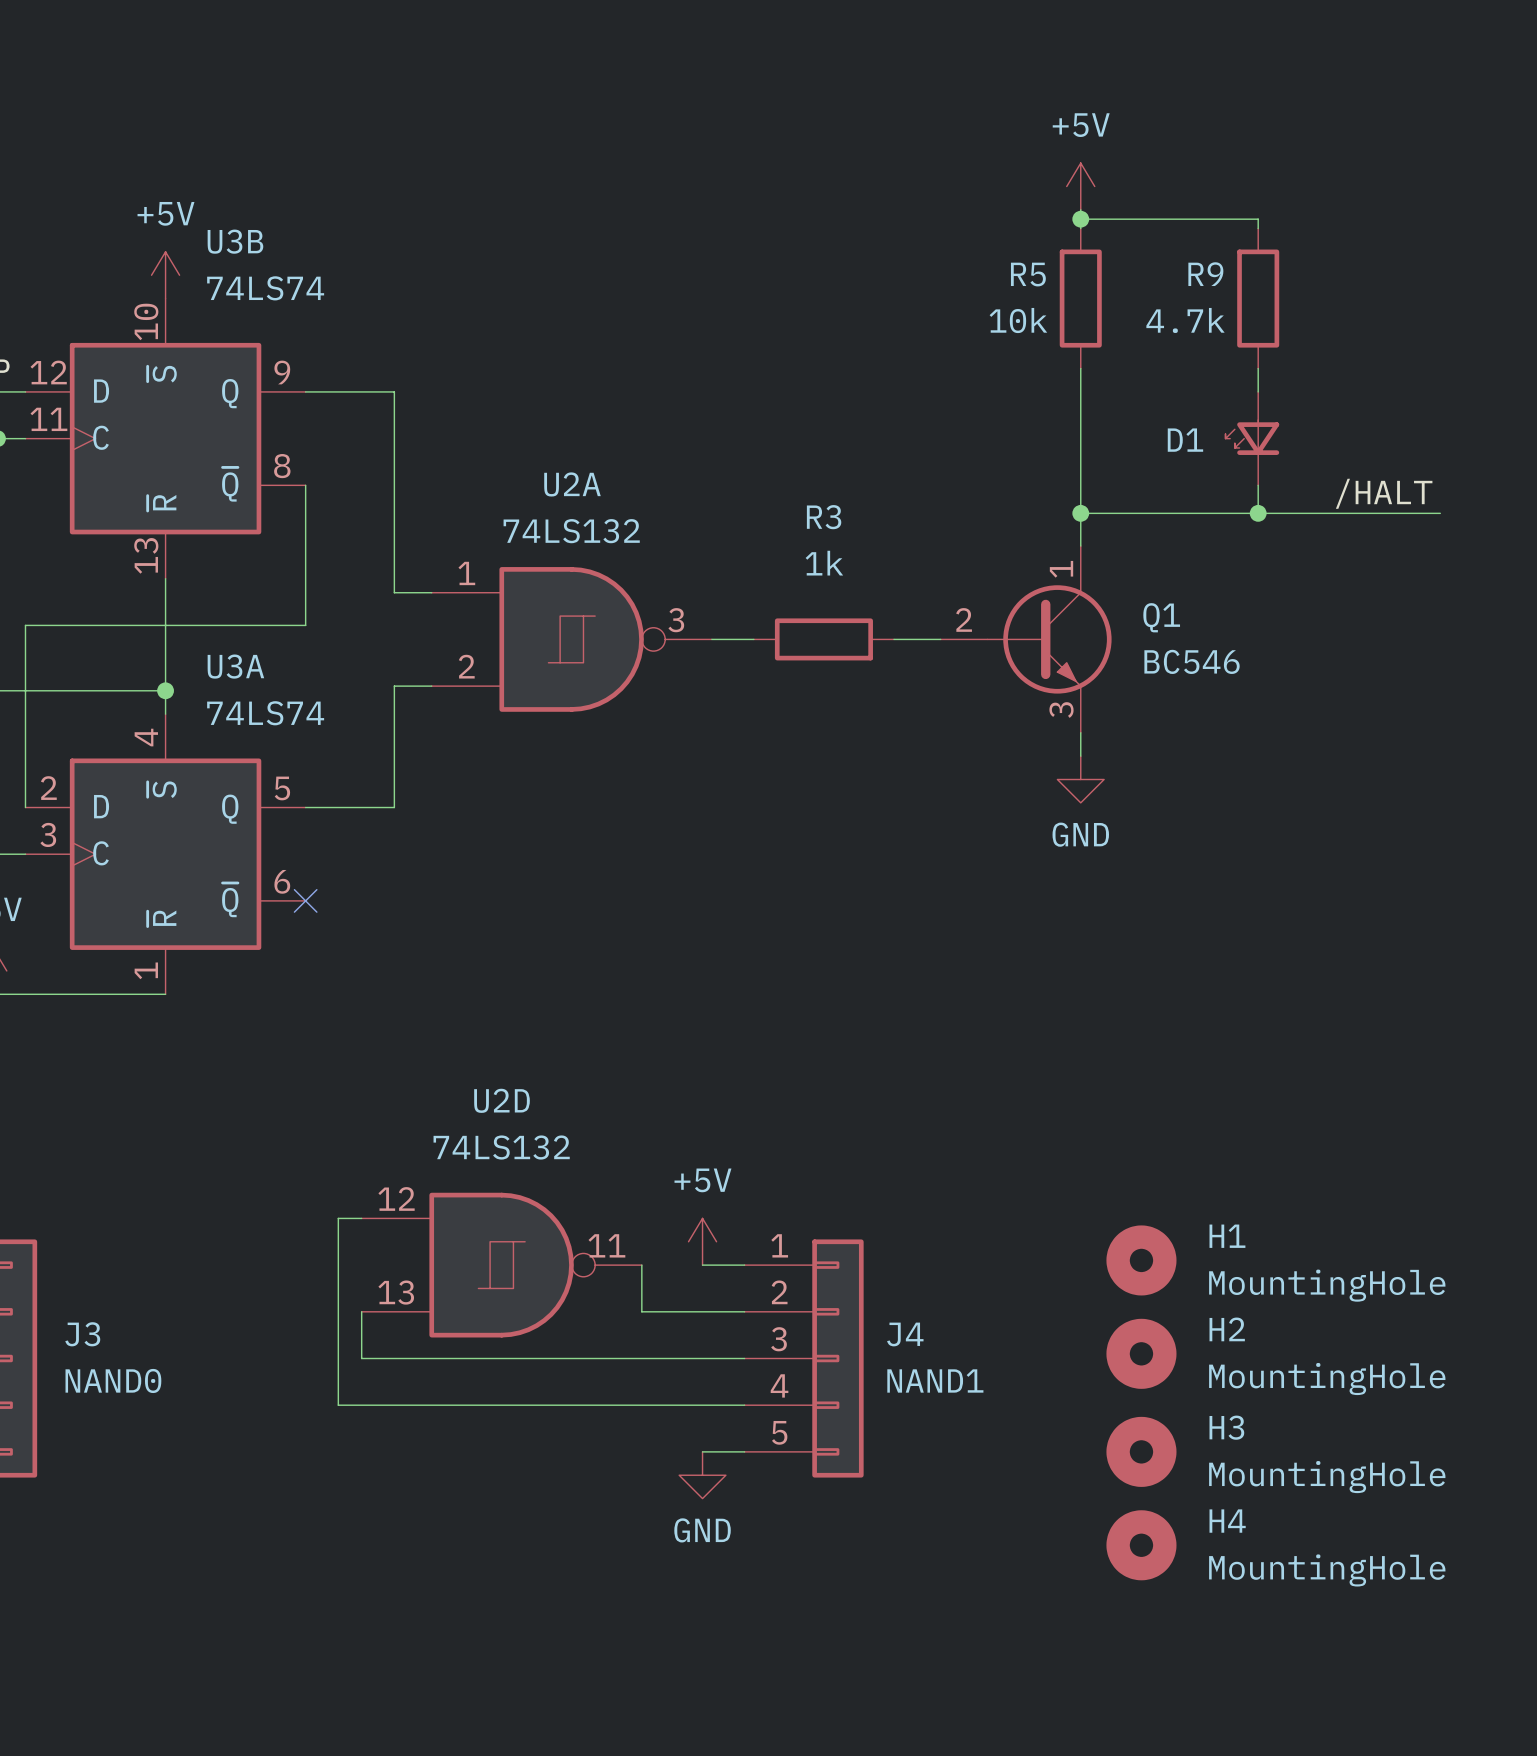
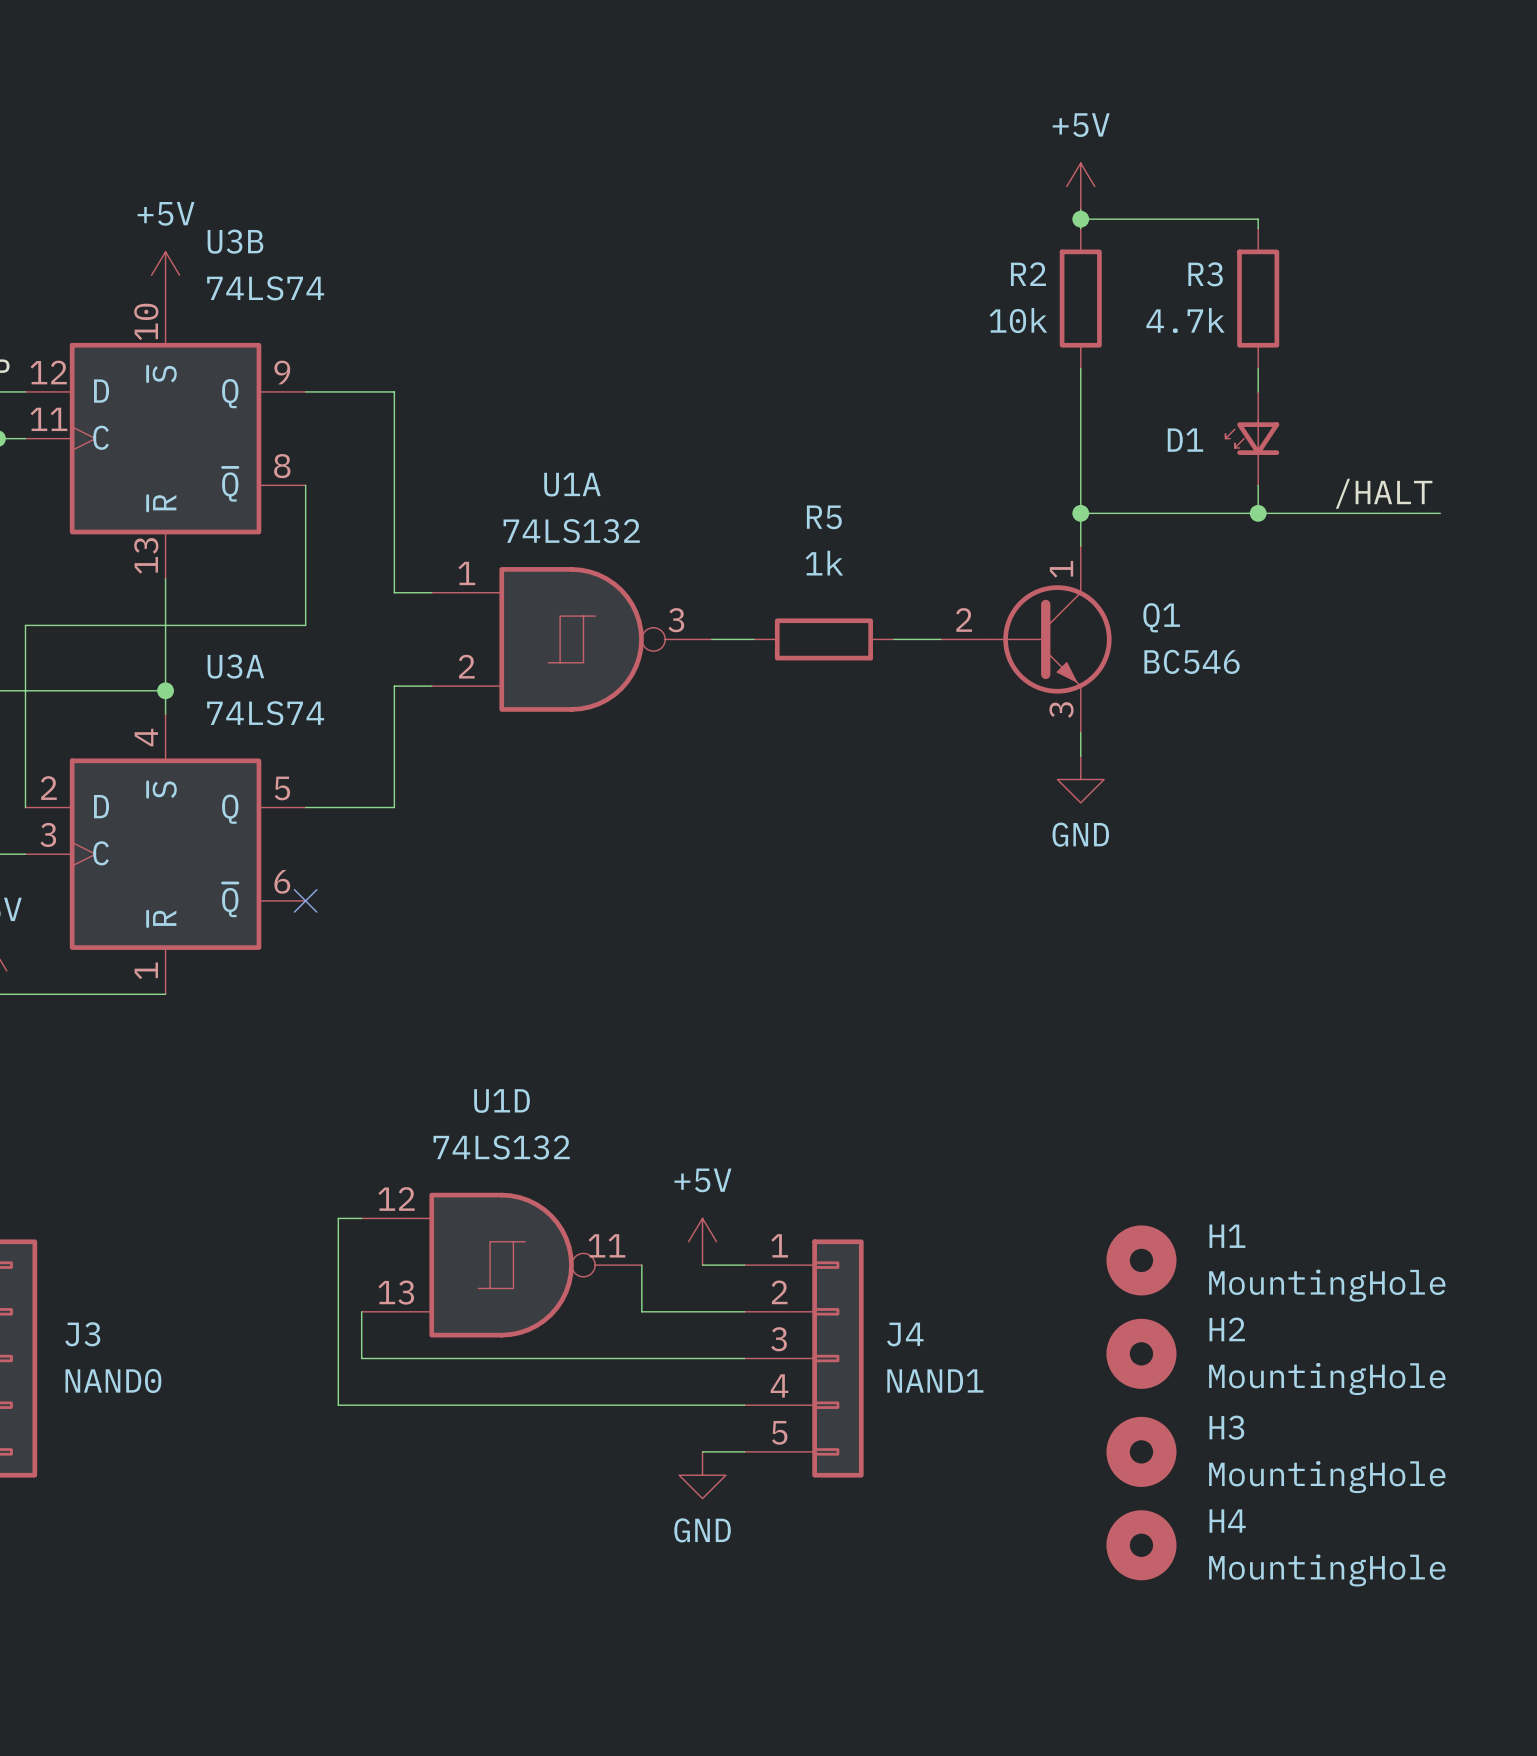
R5 name: R5 (1028, 274) -> R2 (1028, 274)
R9 name: R9 (1205, 274) -> R3 (1205, 274)
U2A name: U2A (572, 484) -> U1A (572, 484)
R3 name: R3 (824, 517) -> R5 (824, 517)
U2D name: U2D (502, 1100) -> U1D (502, 1101)

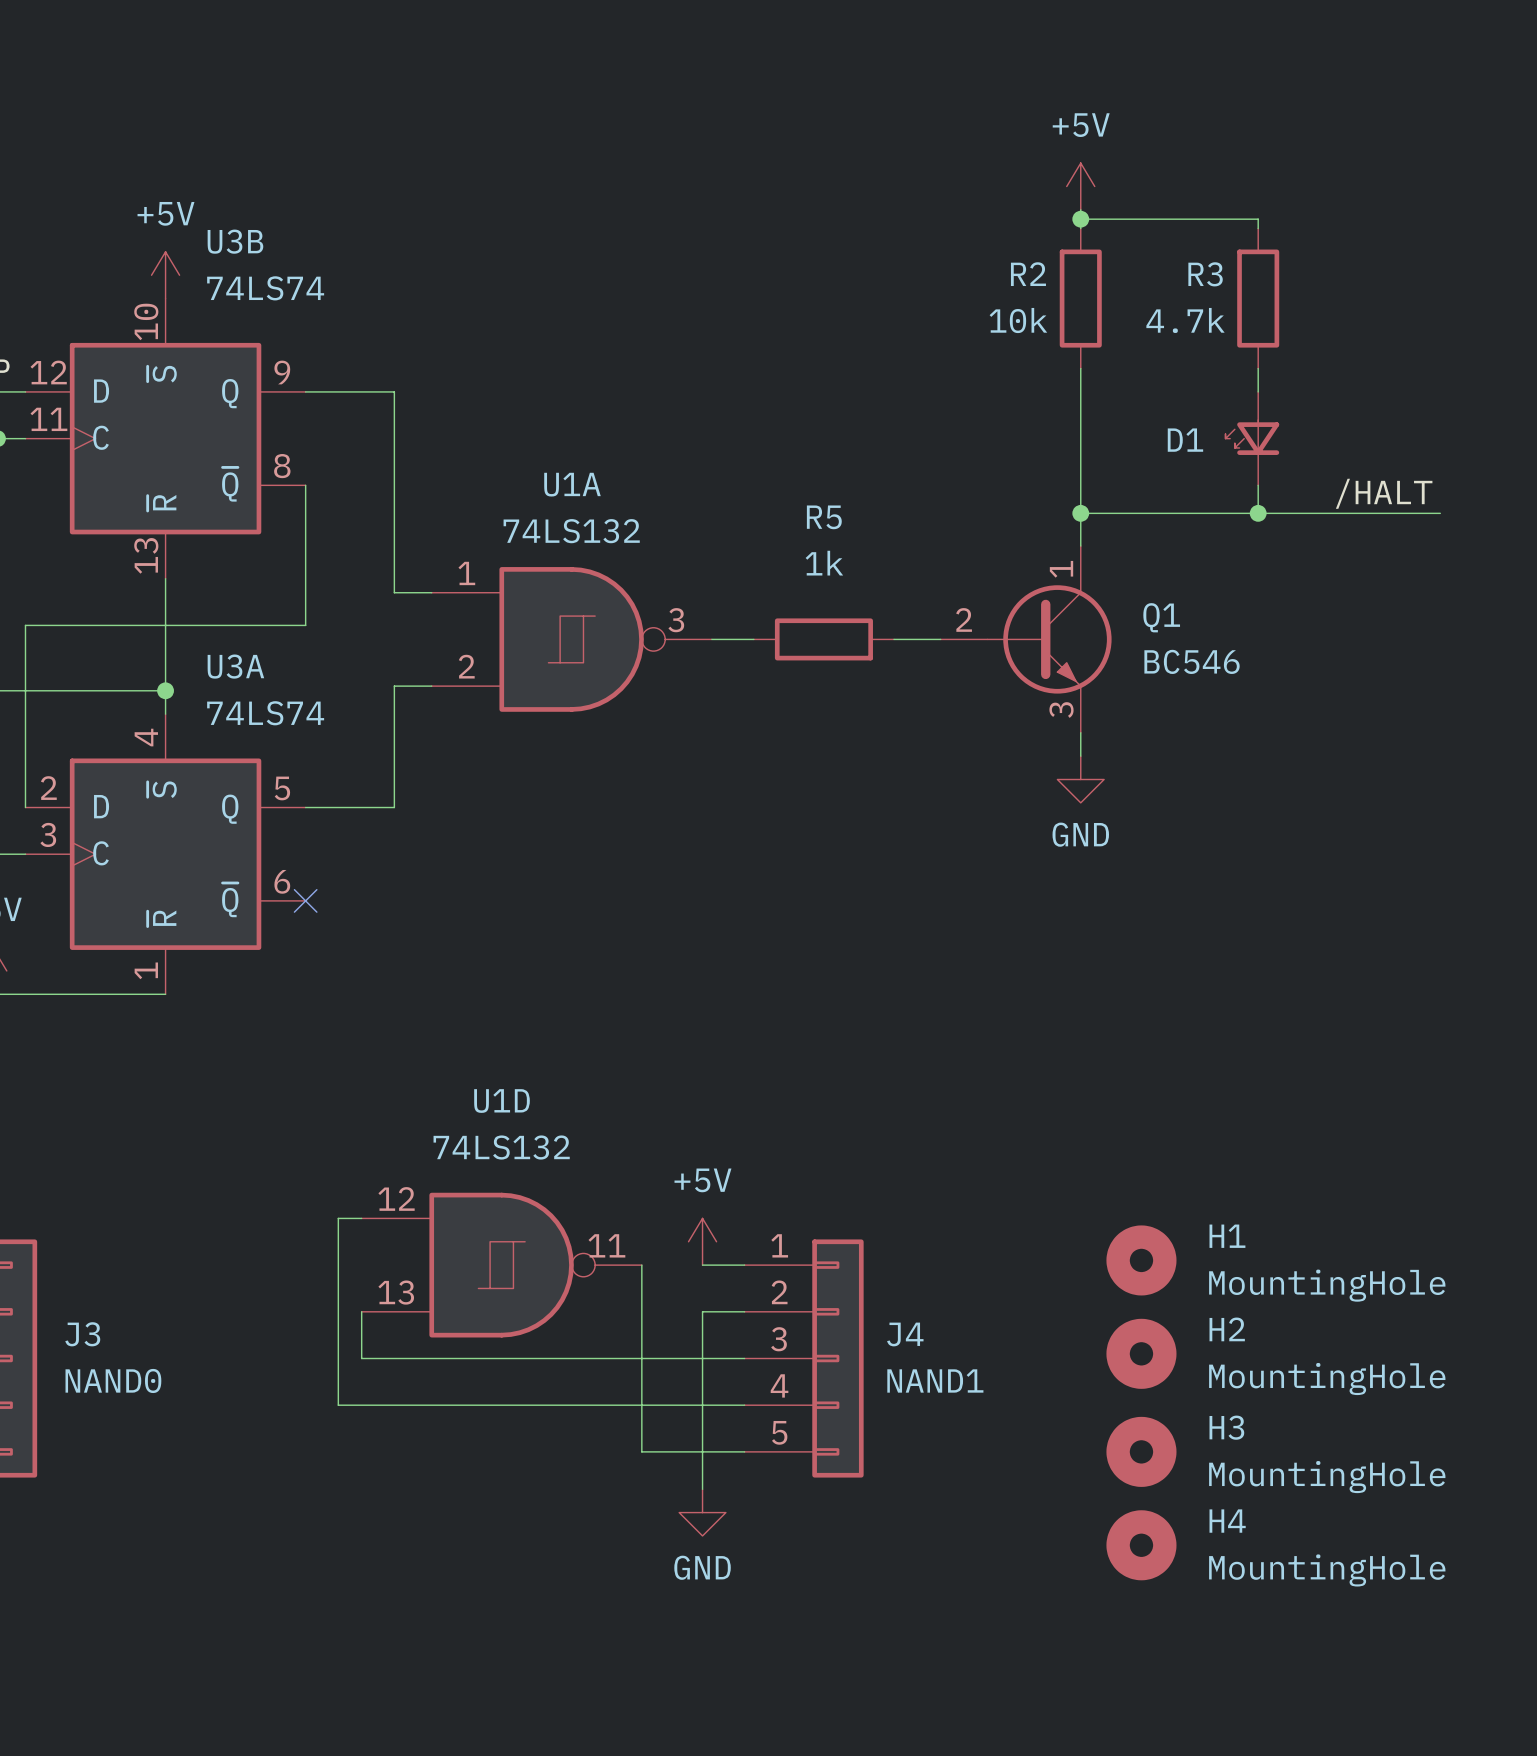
wire: (641, 1311) (702, 1311) -> (641, 1311) (641, 1451) (702, 1451)
wire: none -> (702, 1311) (702, 1489)
power symbol position: GND (702, 1475) -> GND (702, 1512)

